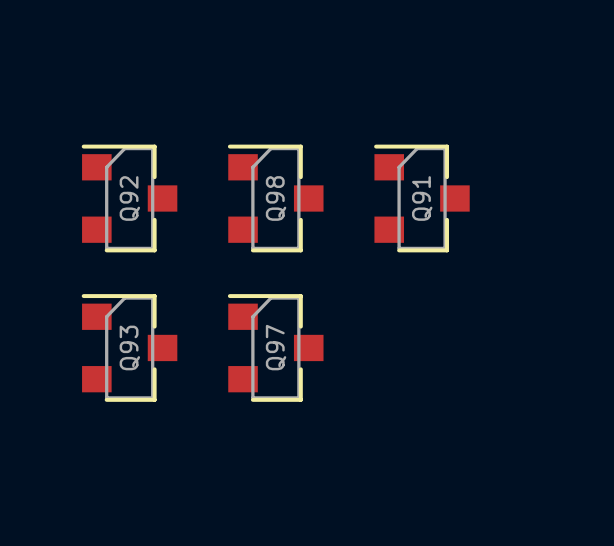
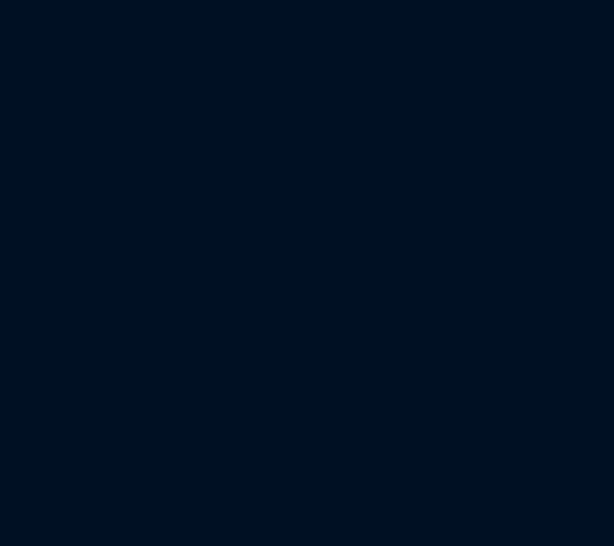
Q92: (129, 198) -> none
Q98: (275, 198) -> none
Q91: (421, 198) -> none
Q93: (129, 347) -> none
Q97: (275, 347) -> none

